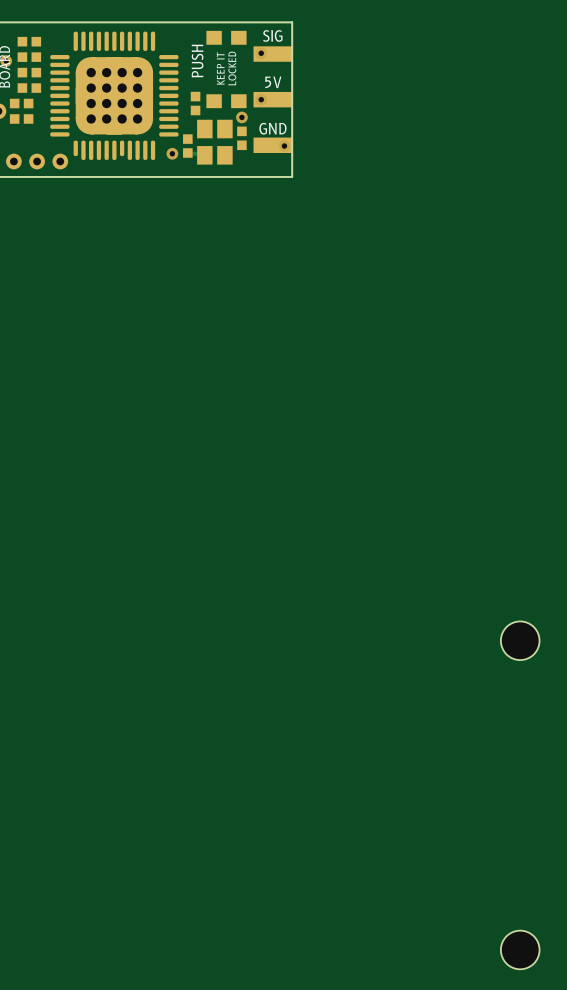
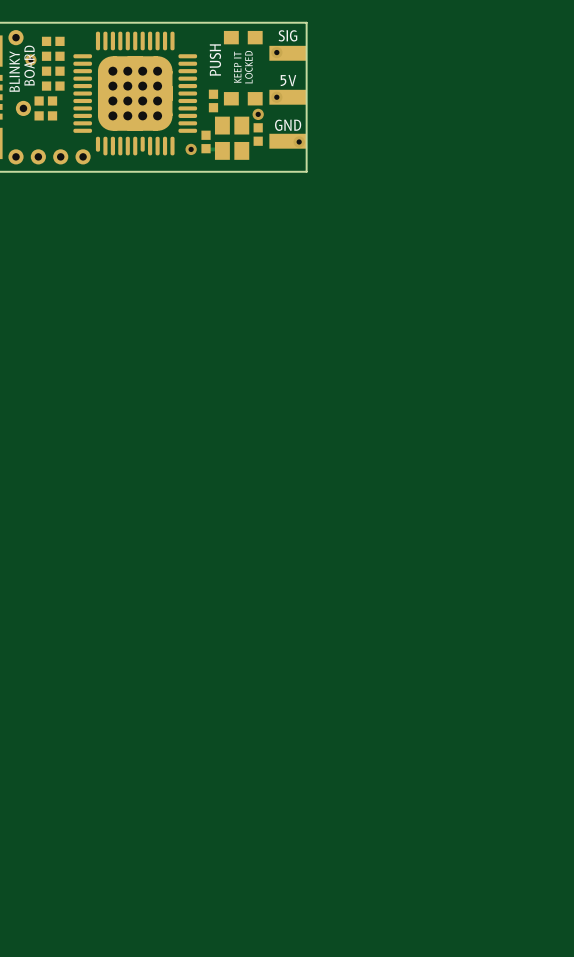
part: (520, 640) -> none
part: (520, 949) -> none

